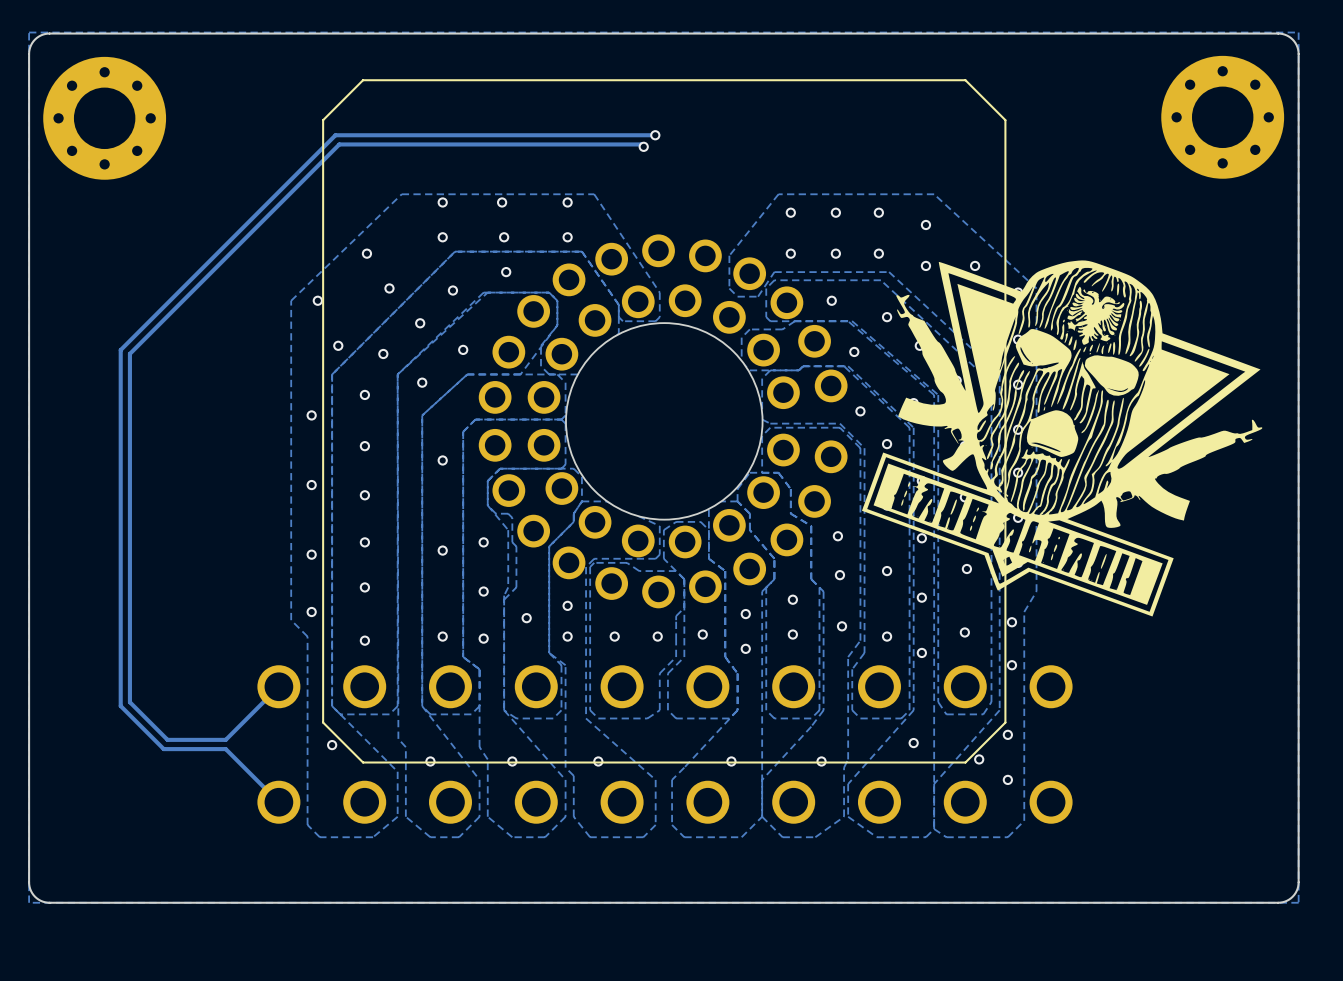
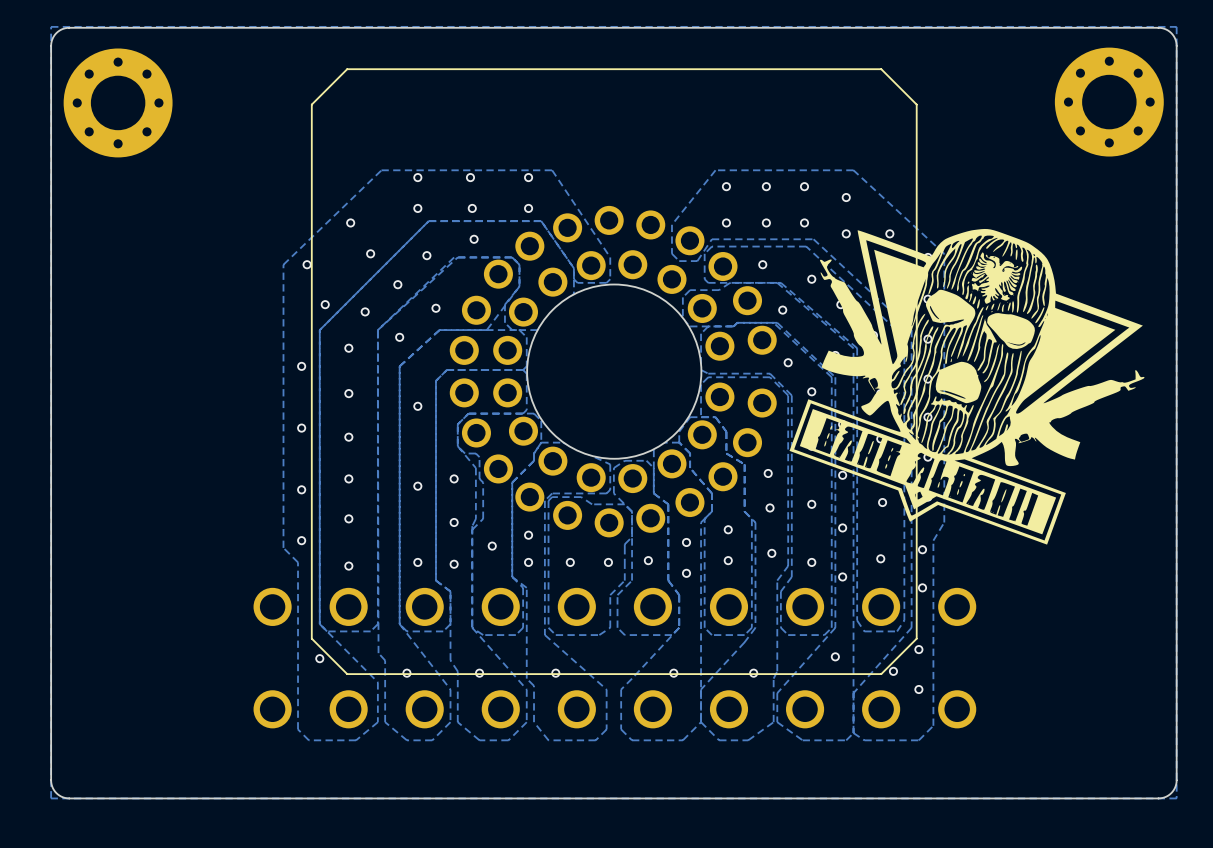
track: (655, 135) (335, 135) (120, 350) (120, 706) (163, 749) (225, 749) (278, 802) -> none
via: (655, 135) -> none
track: (643, 146) (641, 144) (339, 144) (129, 353) (129, 702) (167, 739) (225, 739) (278, 686) -> none
via: (643, 146) -> none

